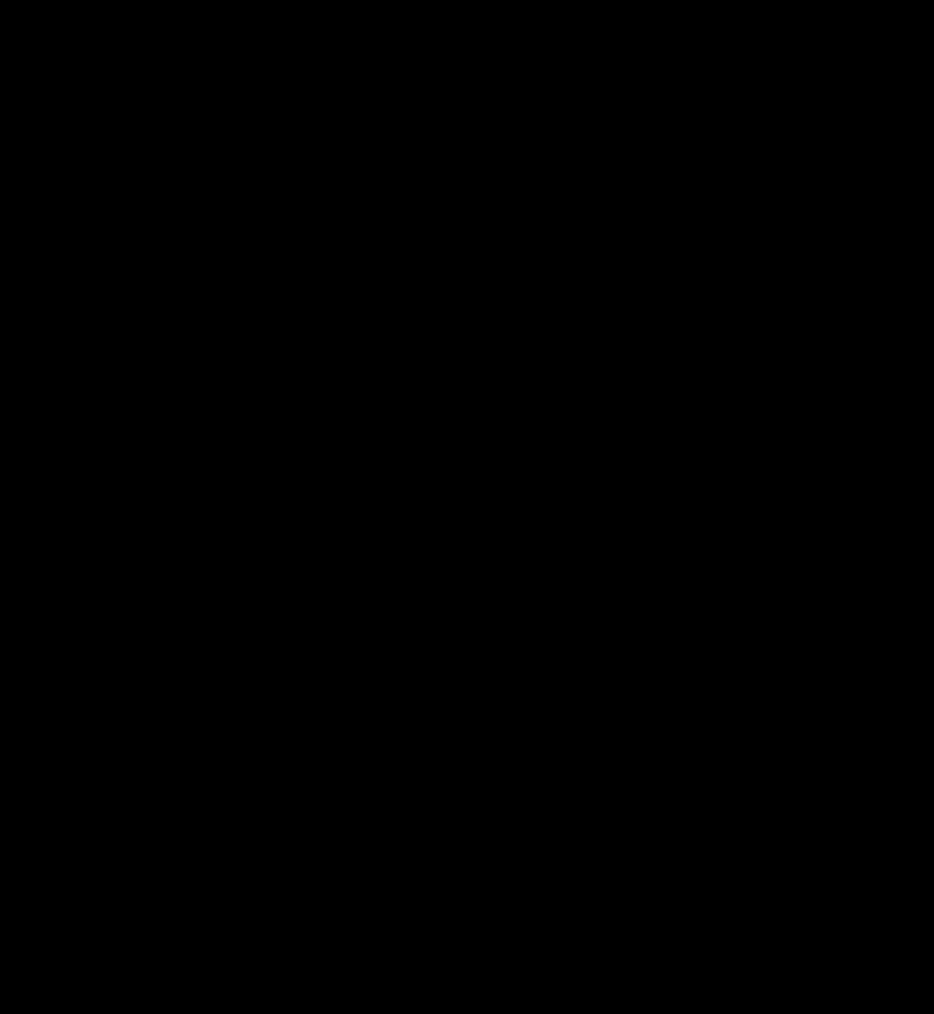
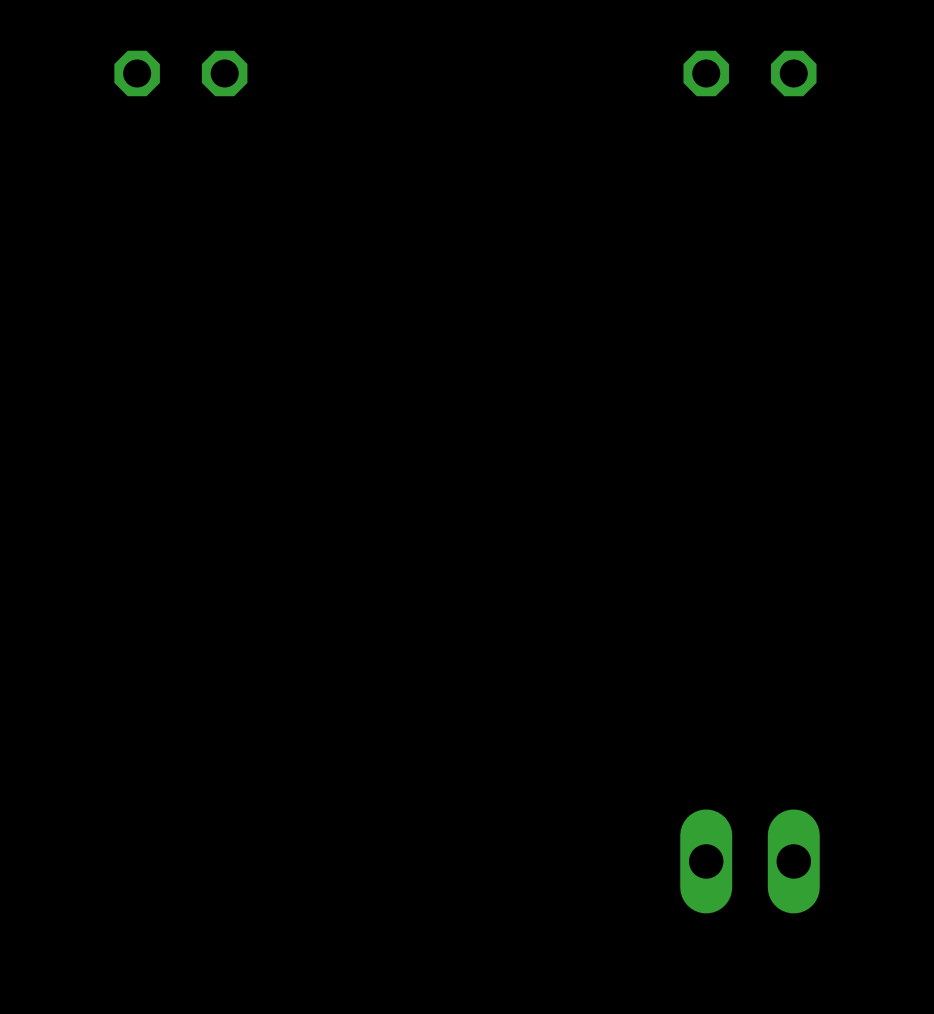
part: none -> (180, 73)
part: none -> (750, 73)
part: none -> (750, 861)

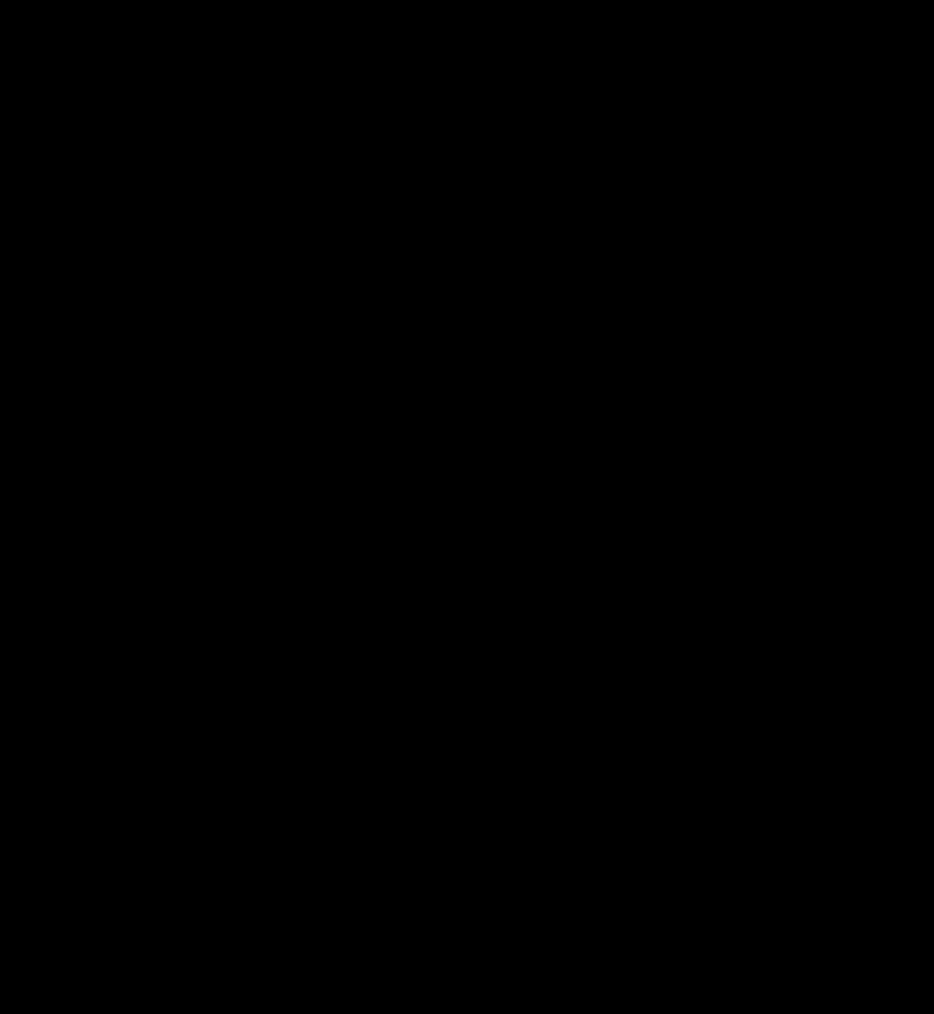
part: (180, 73) -> none
part: (750, 73) -> none
part: (750, 861) -> none

